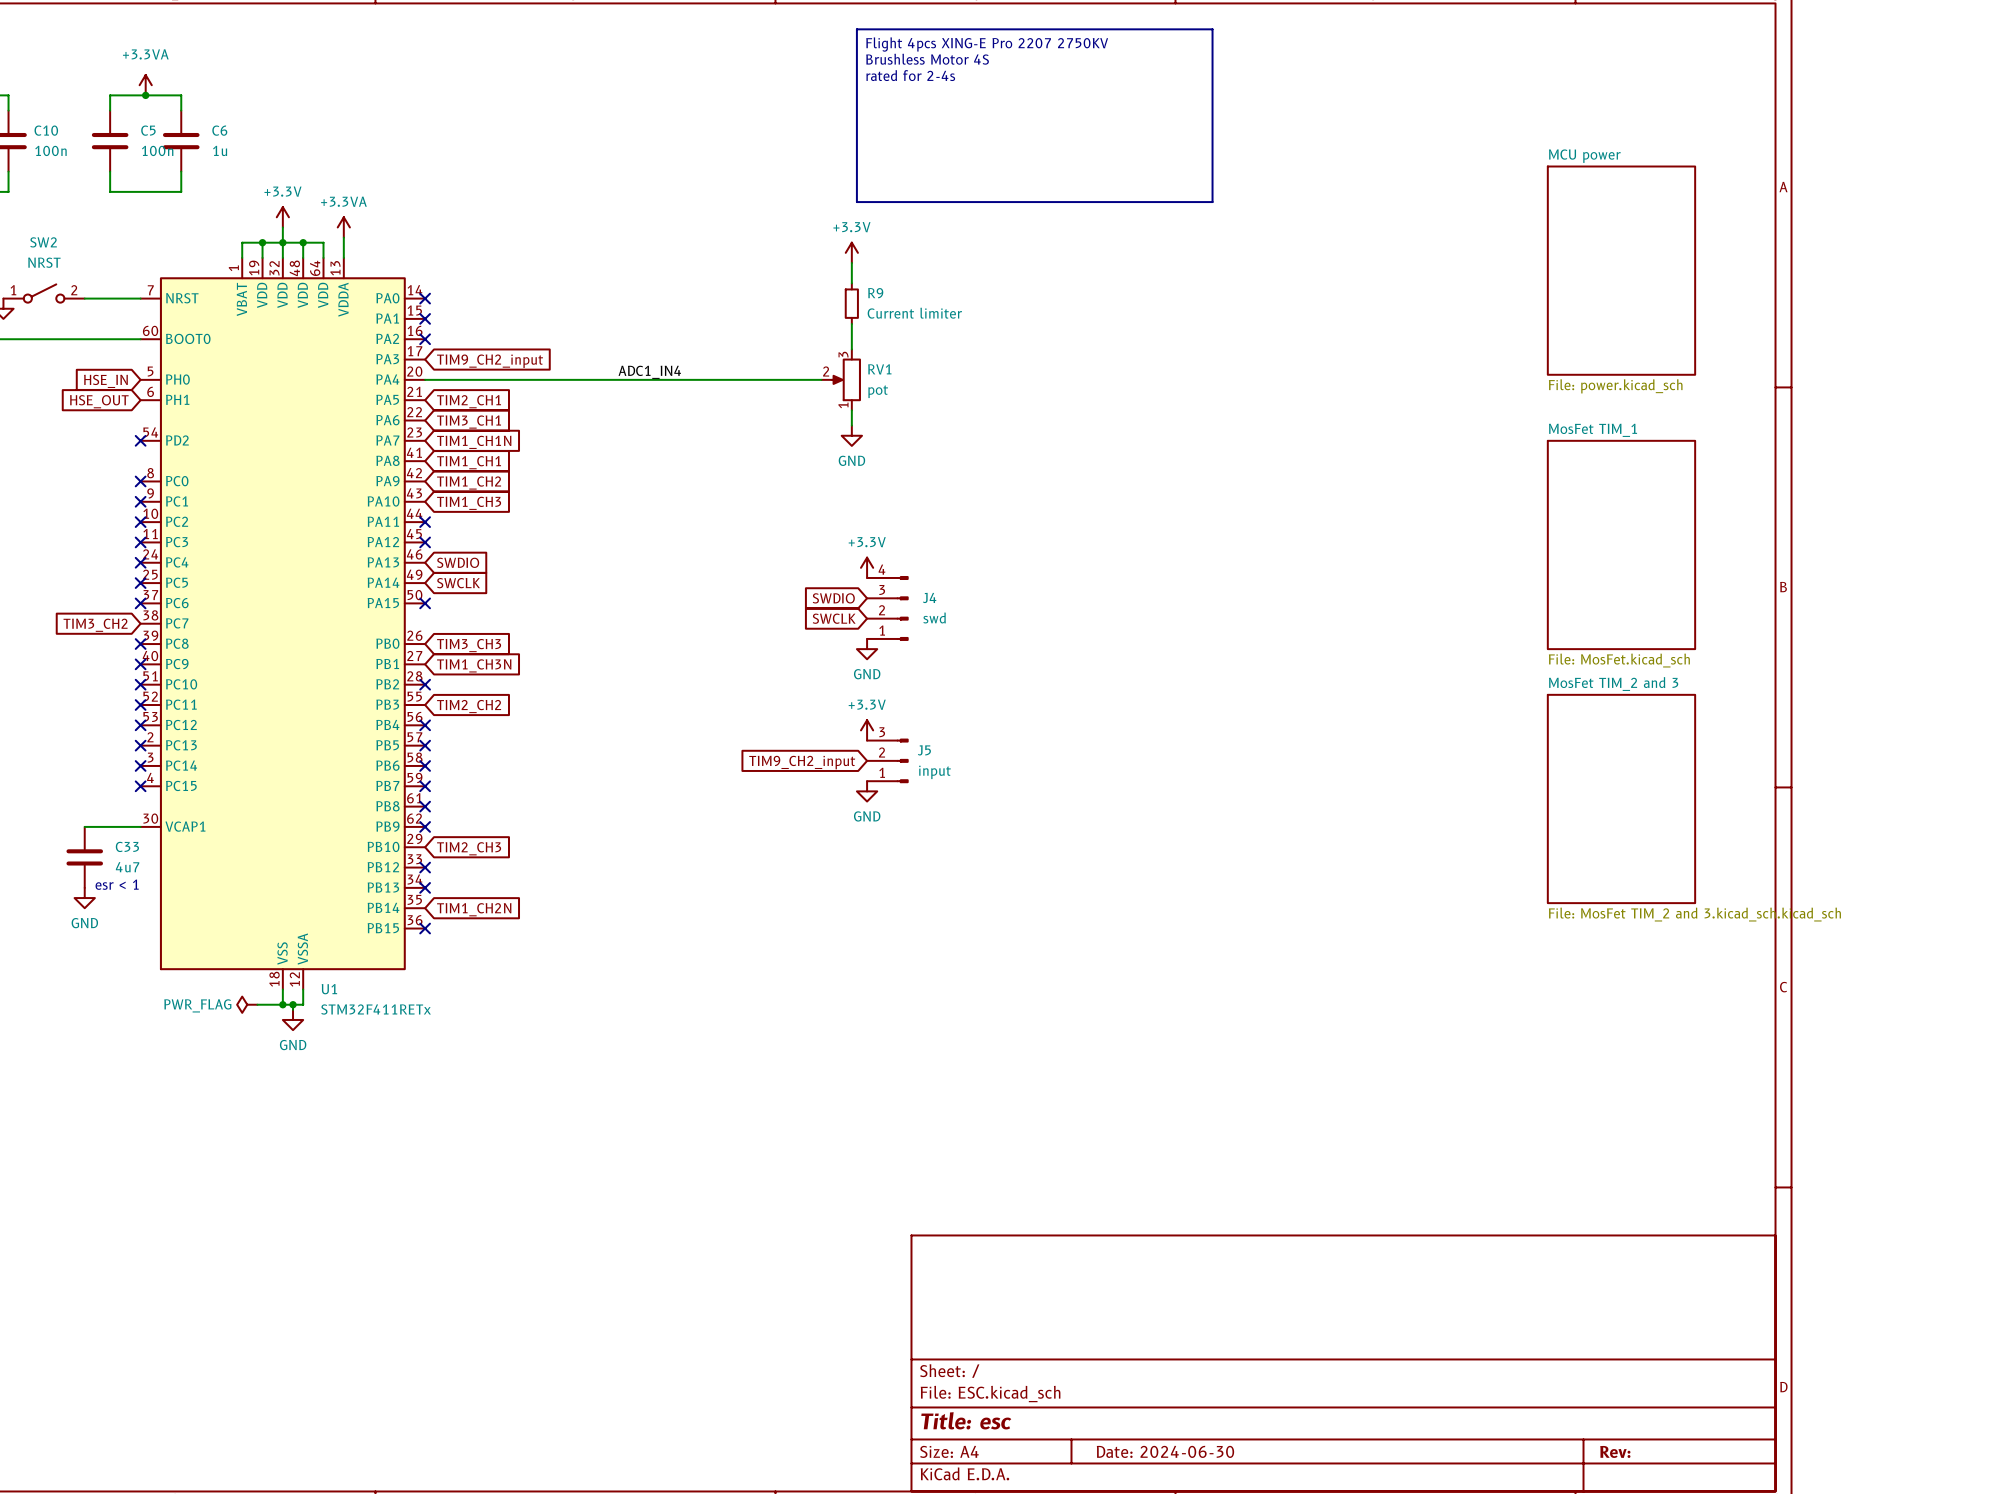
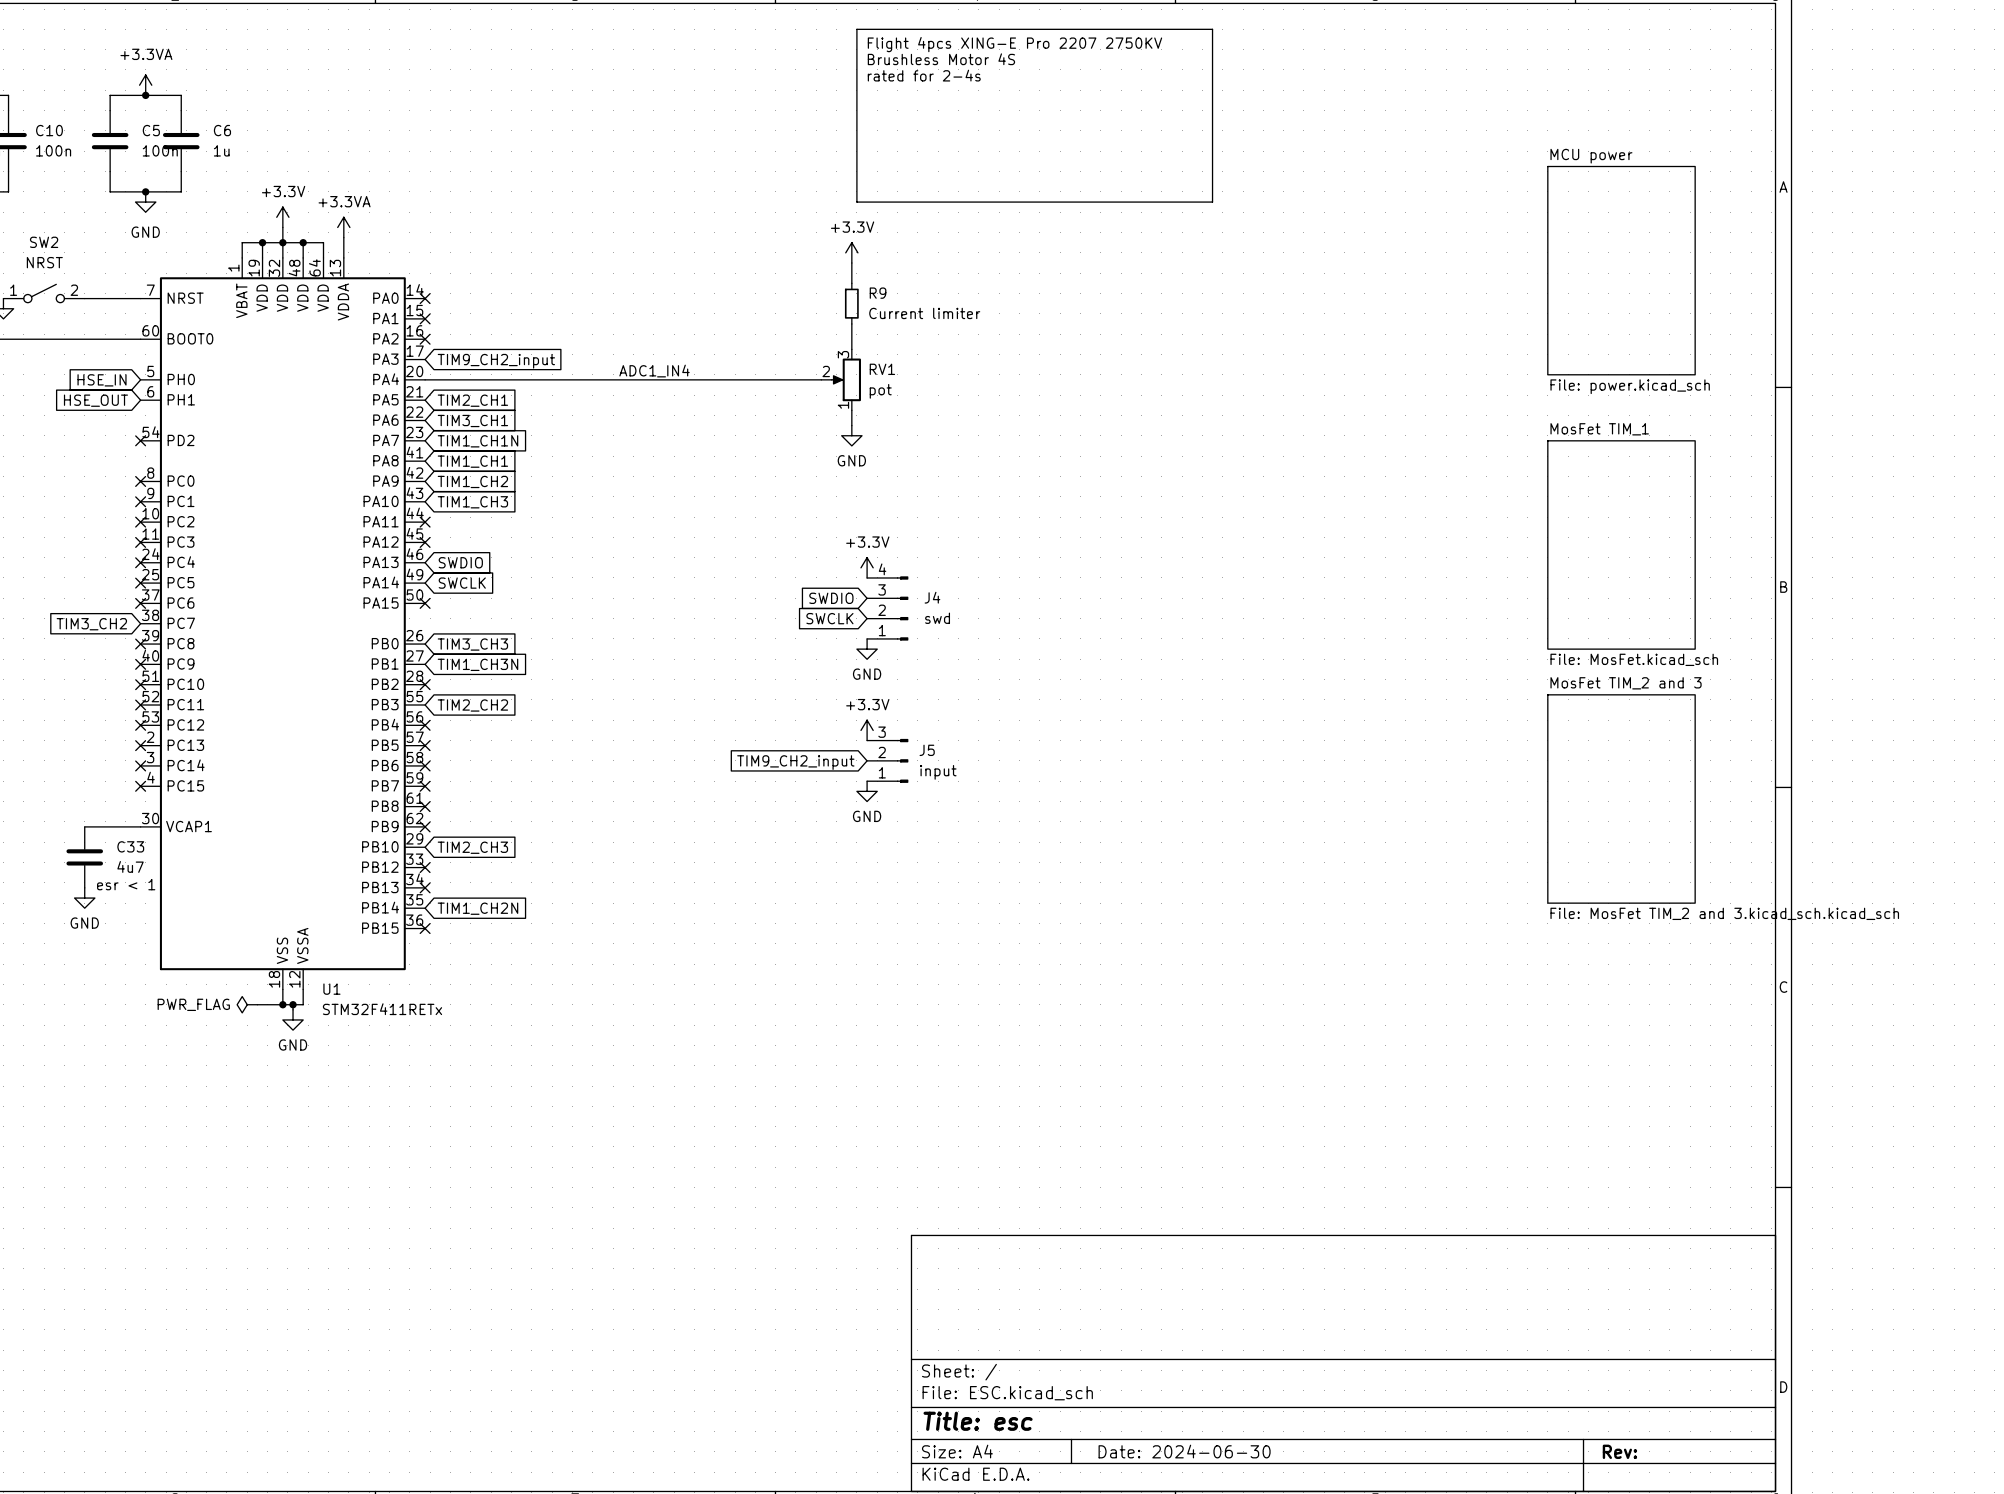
junction: none -> (145, 191)
power symbol: none -> GND (145, 202)

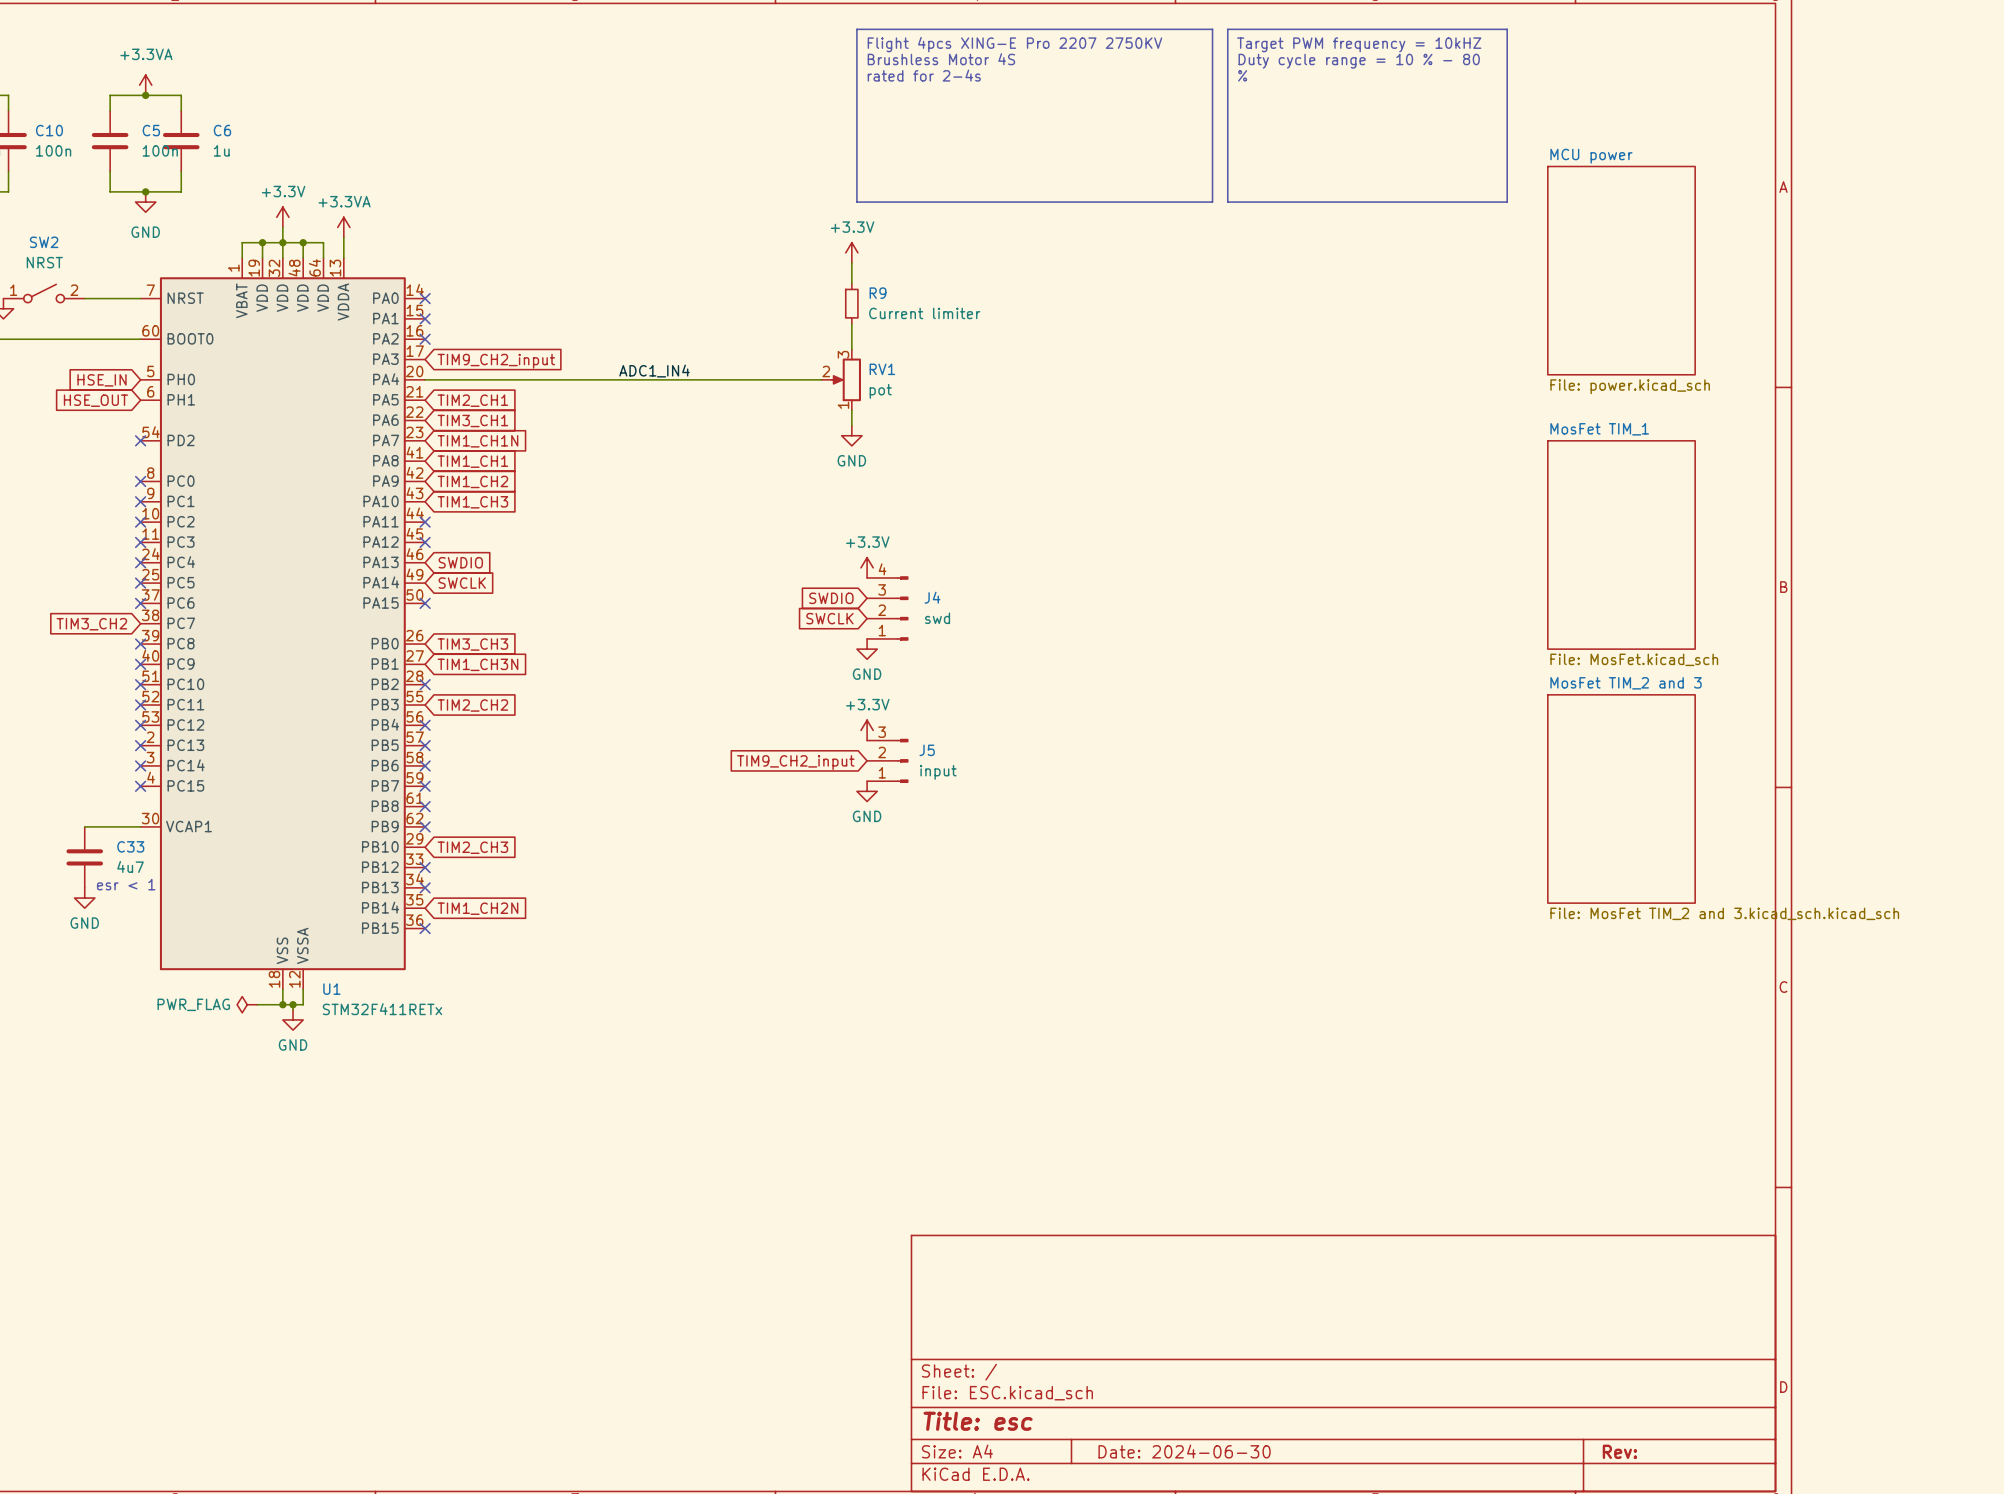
line: none -> (1227, 29) (1507, 29) (1507, 202) (1227, 202) (1227, 29)
text: none -> Target PWM frequency = 10kHZ (1359, 44)
text: none -> Duty cycle range = 10 % - 80 (1359, 61)
text: none -> % (1242, 75)

